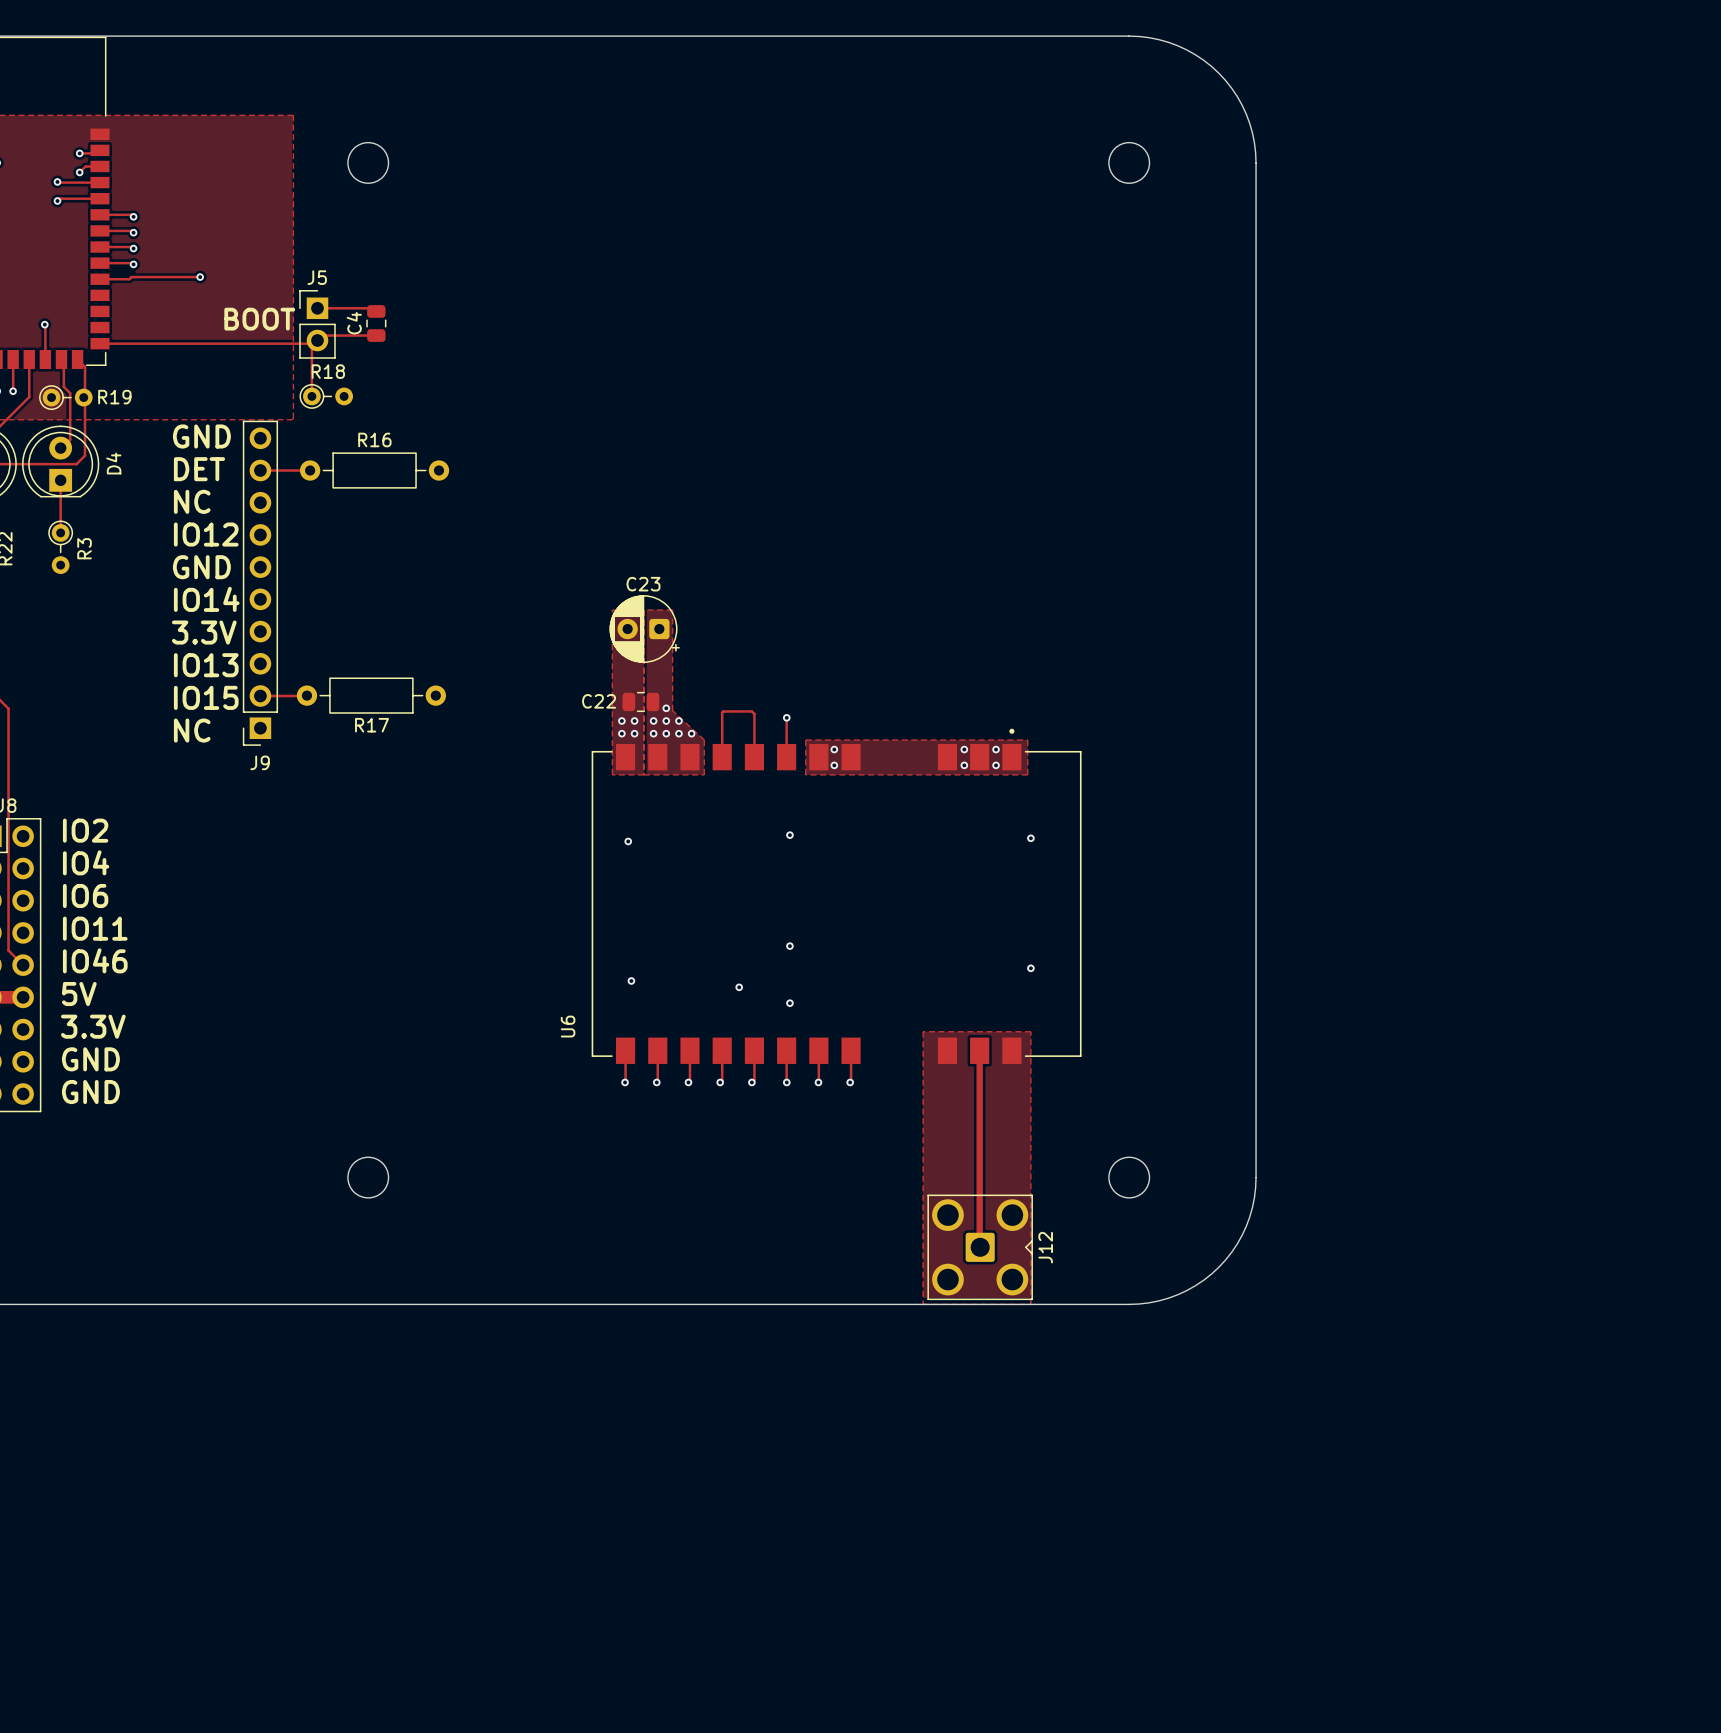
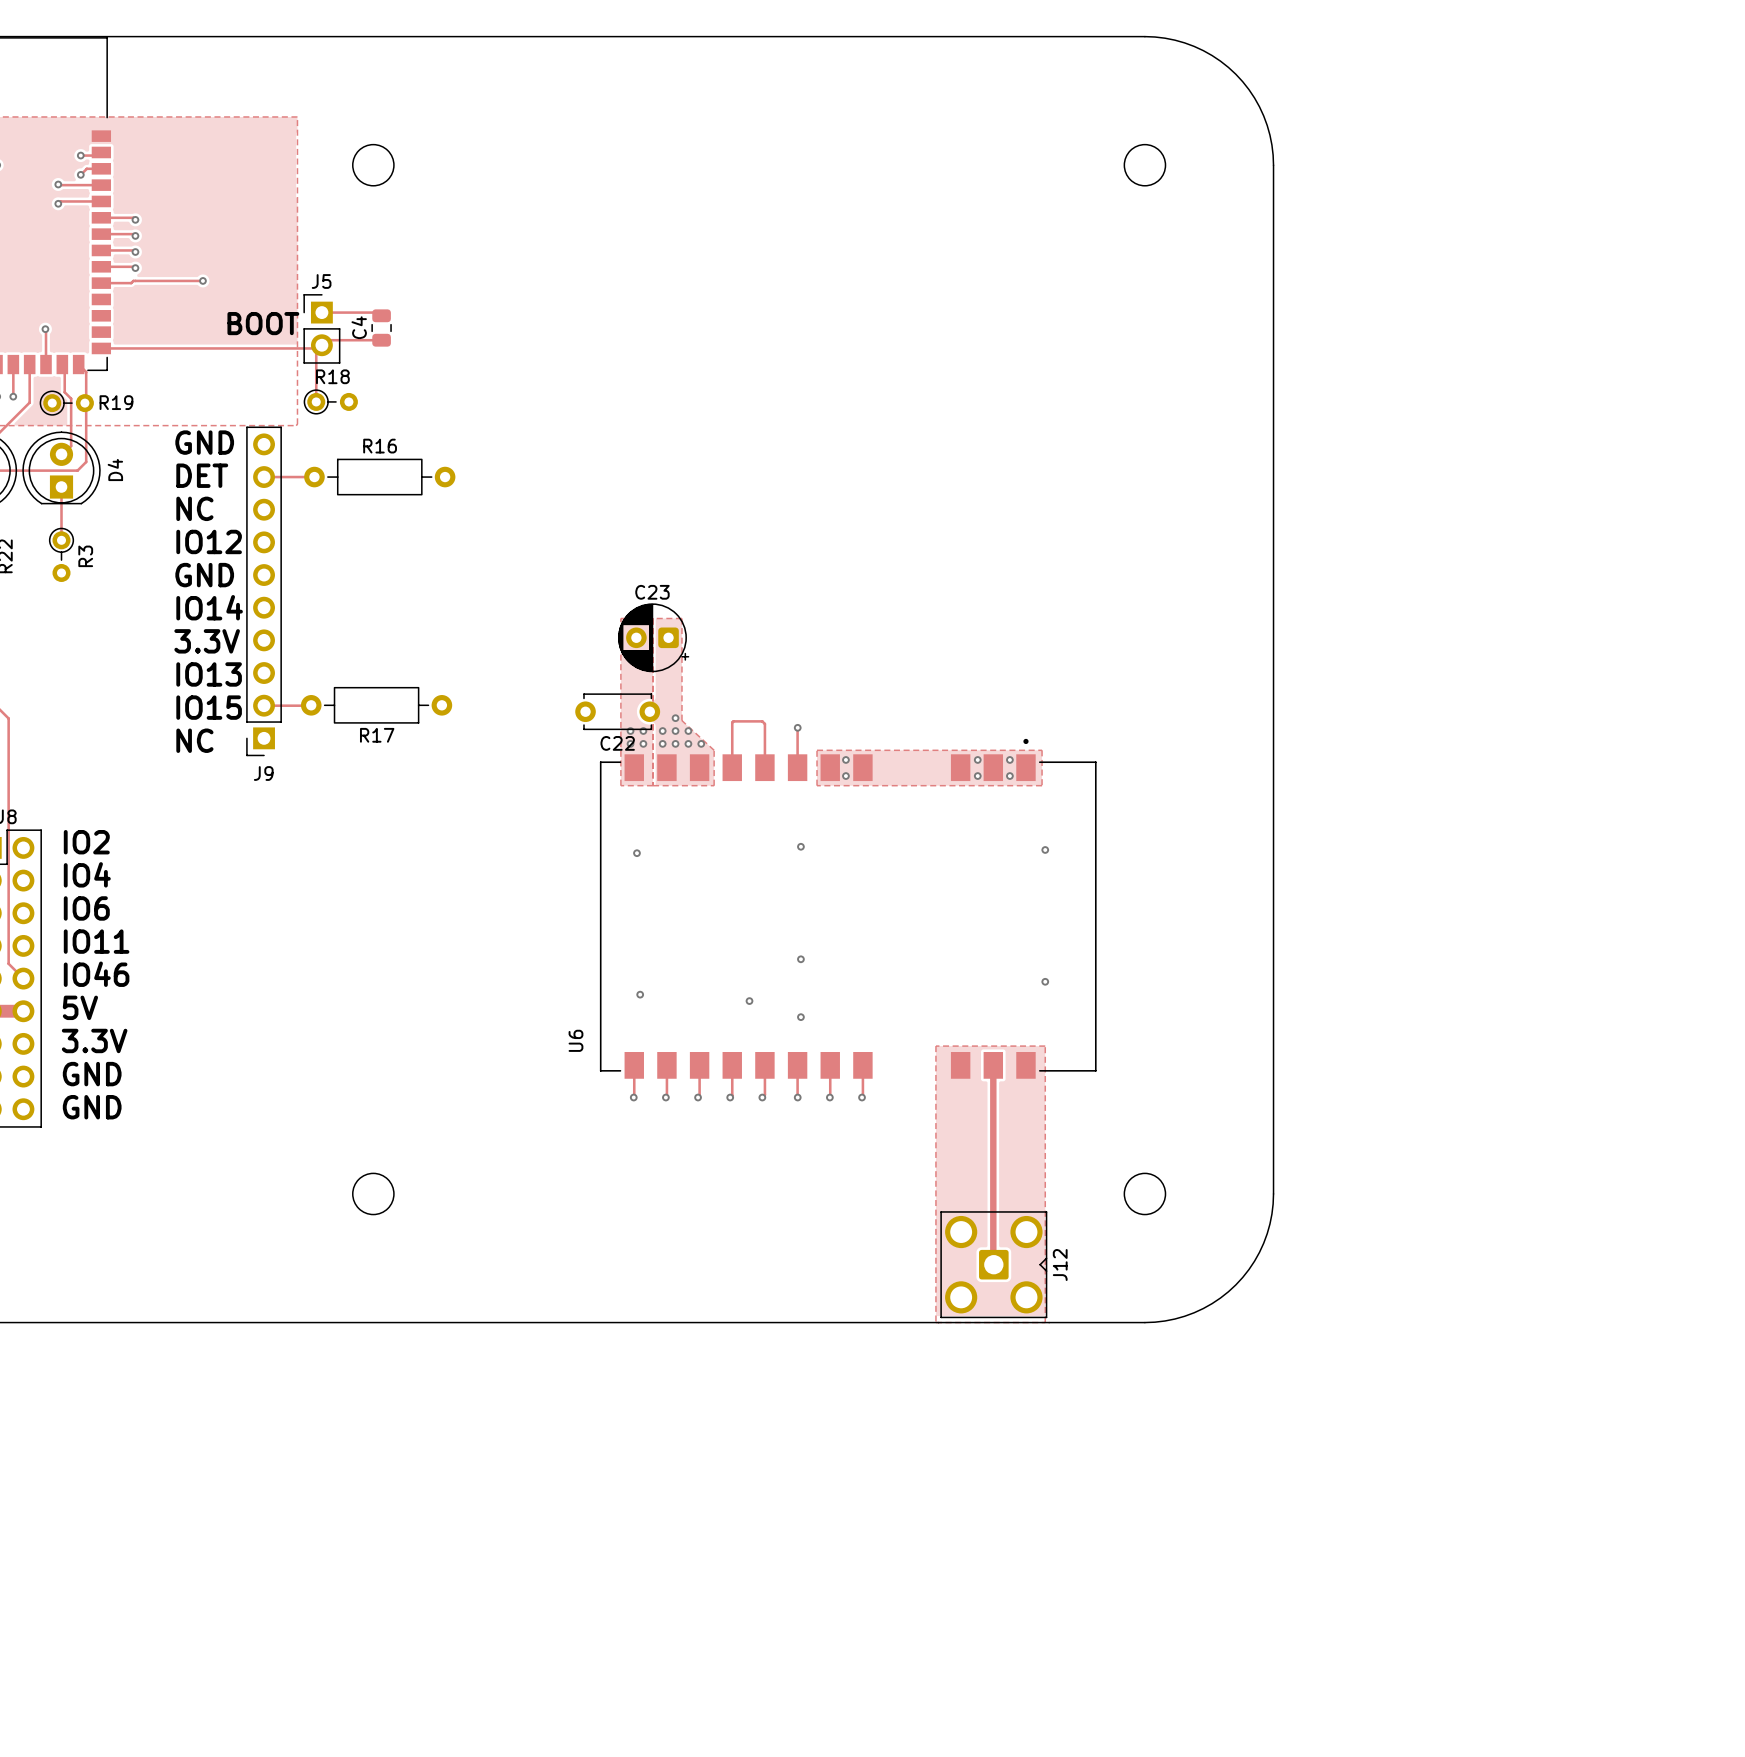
C22 footprint: [622, 691, 660, 713] -> [575, 693, 661, 731]
C22 name position: C22 (599, 701) -> C22 (617, 743)

